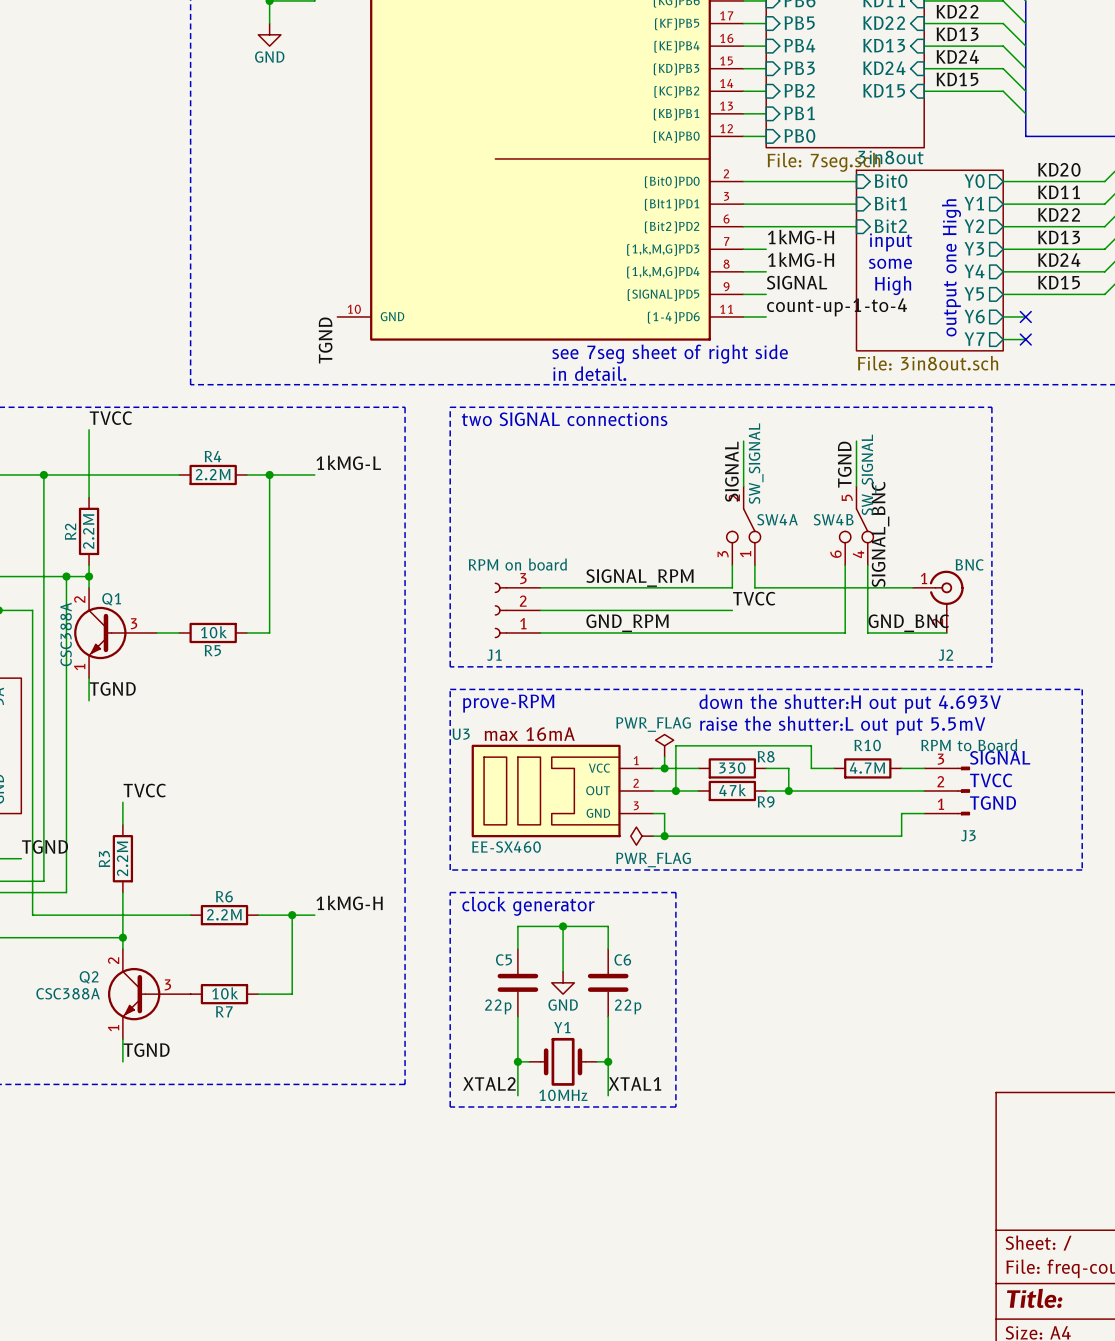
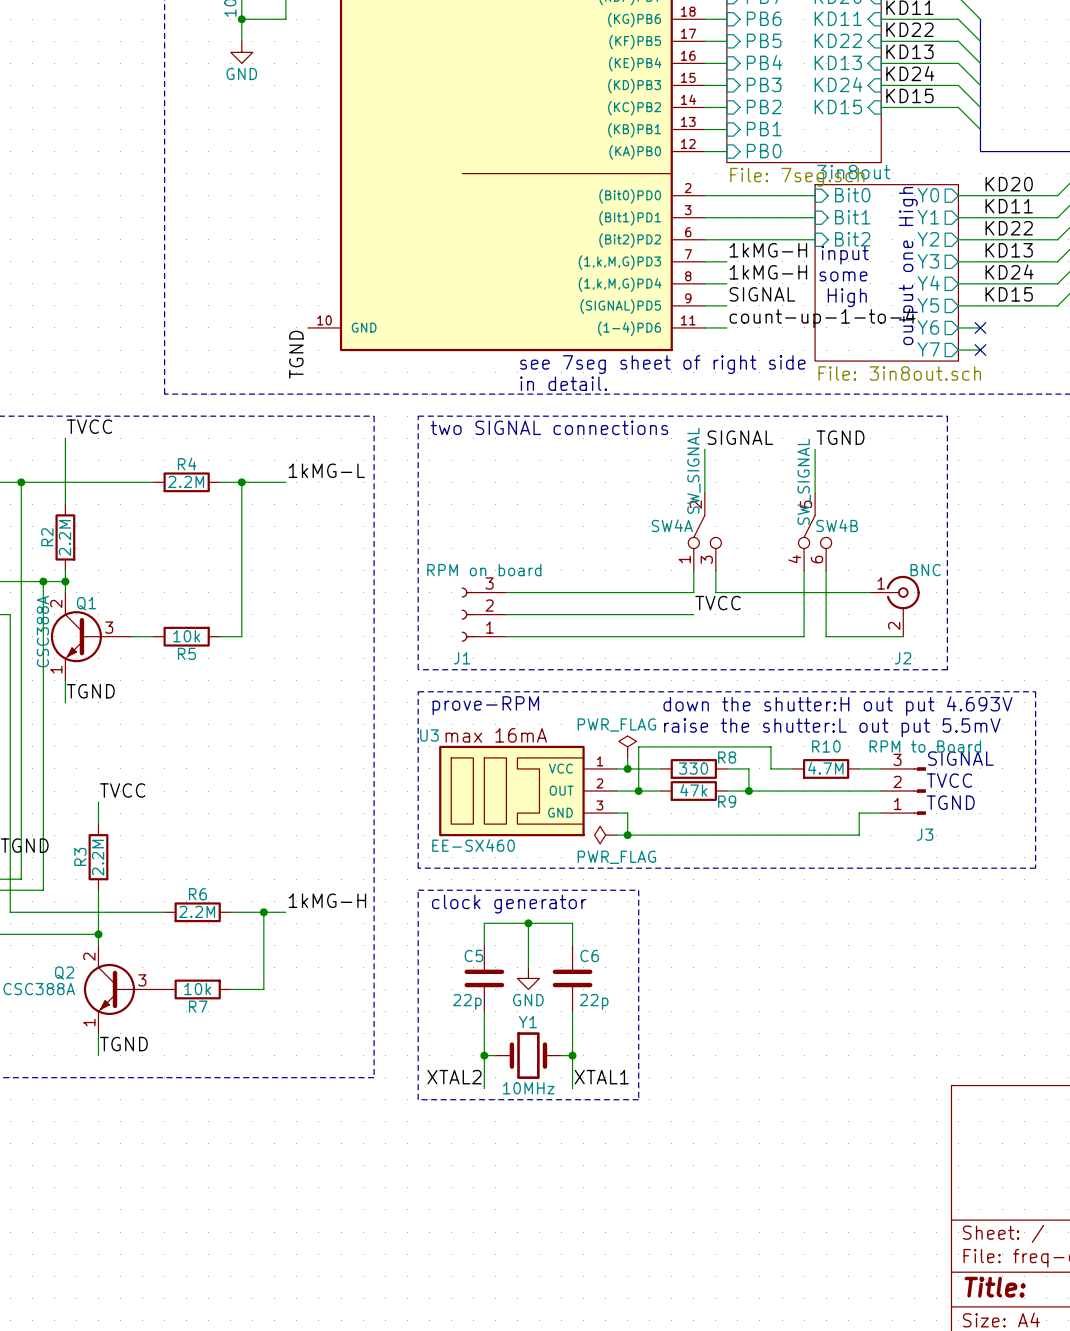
label rotation: 0° (844, 464) -> 90° clockwise (840, 437)
label rotation: 0° (731, 471) -> 90° clockwise (740, 437)
label: SIGNAL_BNC (880, 534) -> none
SW4A flip: as is (757, 548) -> left-right (691, 553)
SW4B flip: as is (870, 548) -> left-right (801, 553)
label: SIGNAL_RPM (639, 578) -> none
label: GND_RPM (627, 623) -> none
label: GND_BNC (908, 623) -> none

